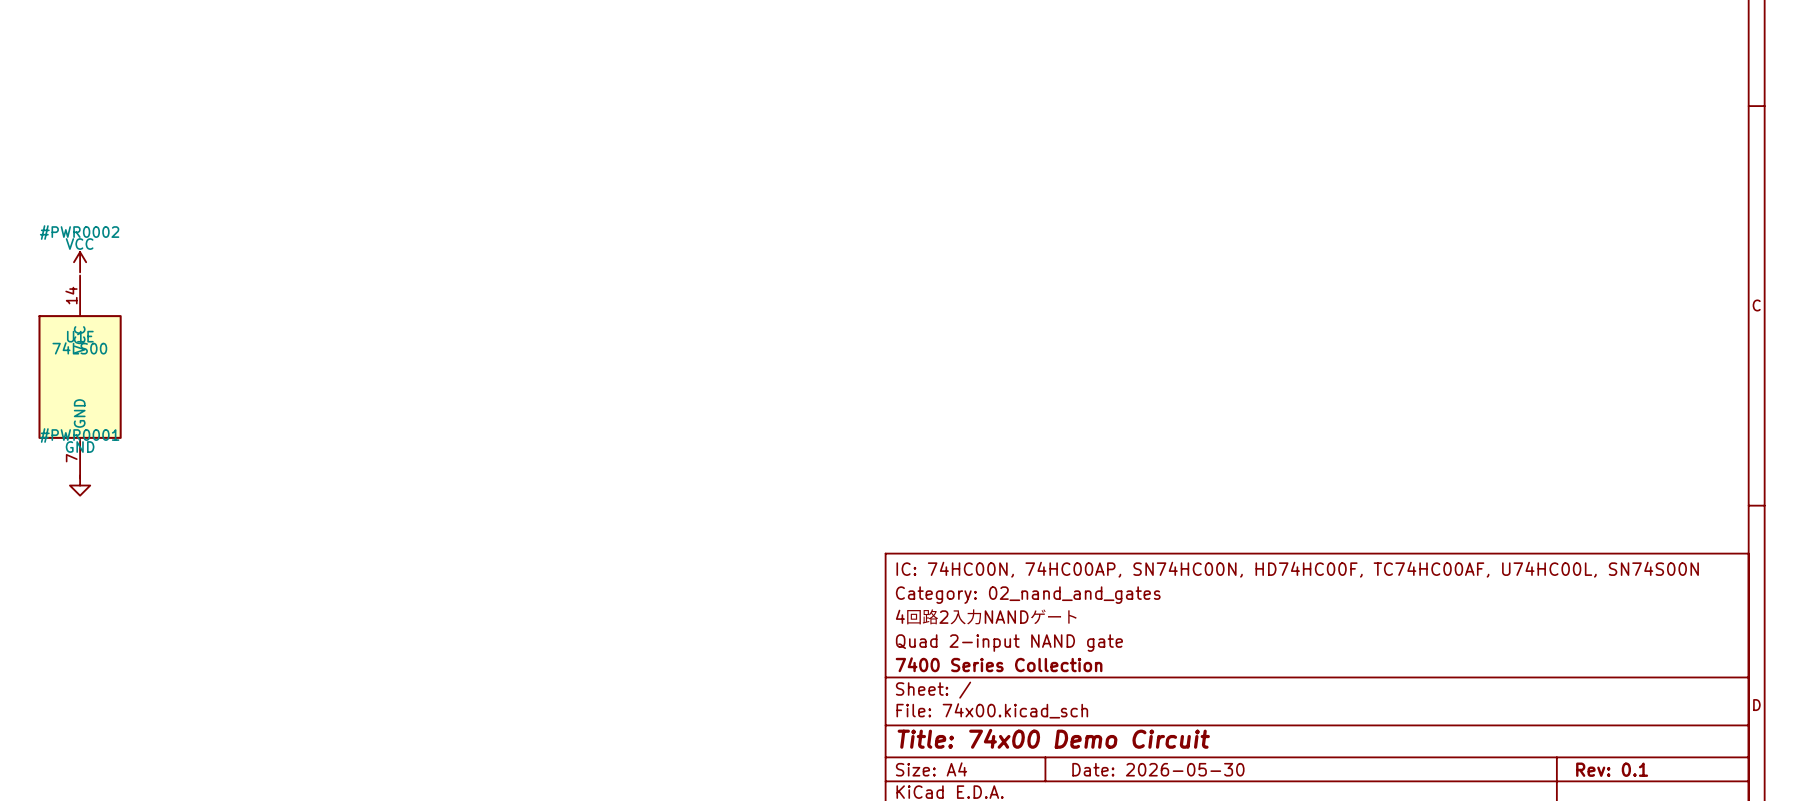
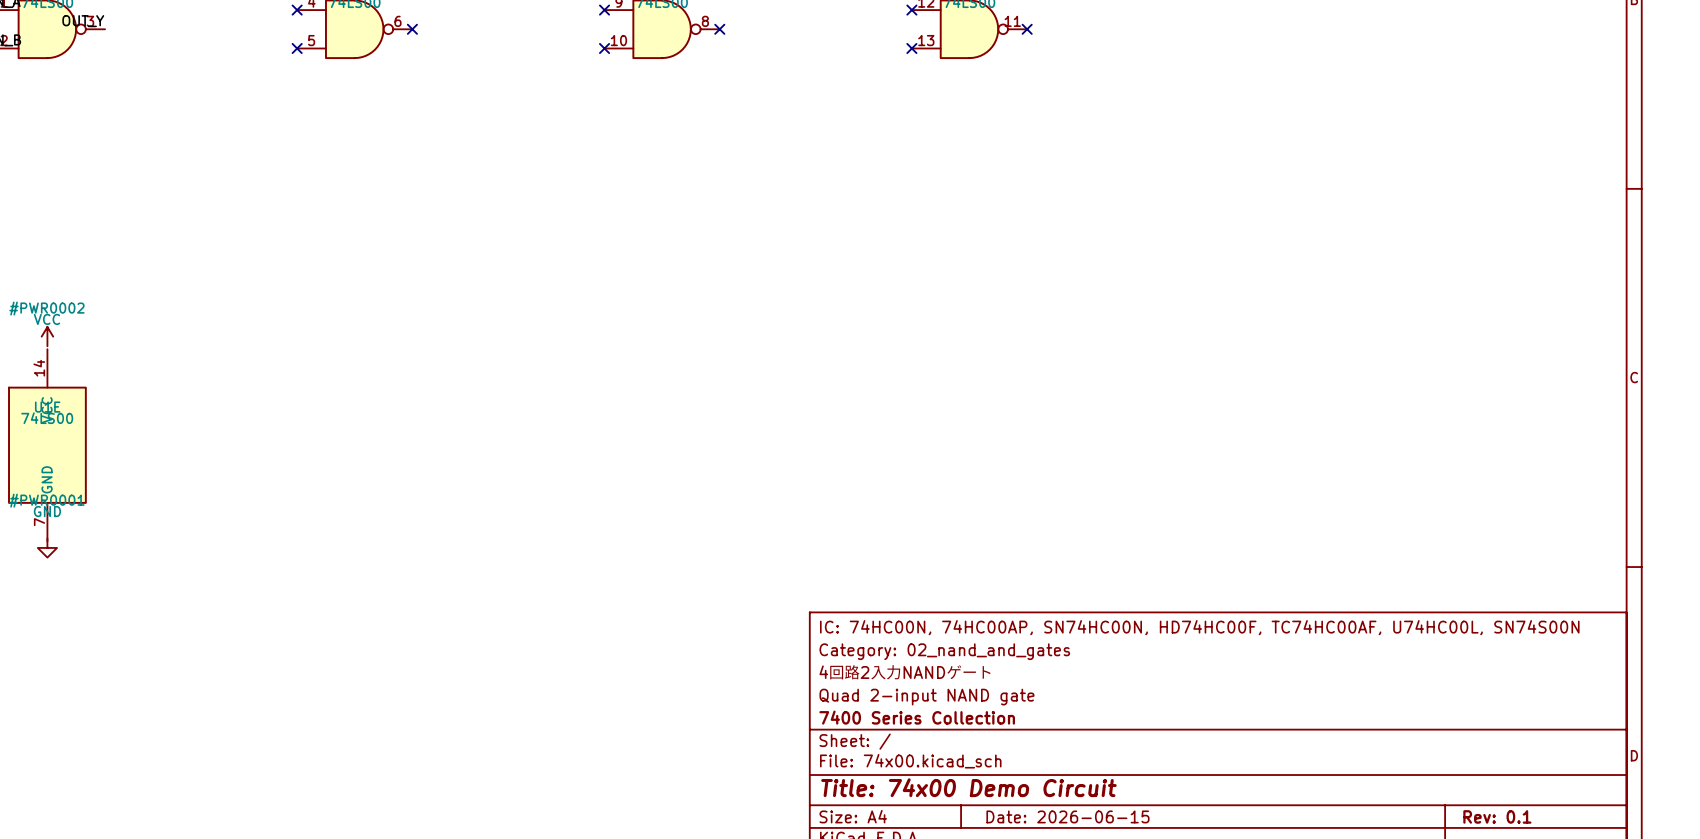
title block: Date: 2026-05-30 (1158, 769) -> Date: 2026-06-15 (1067, 816)

